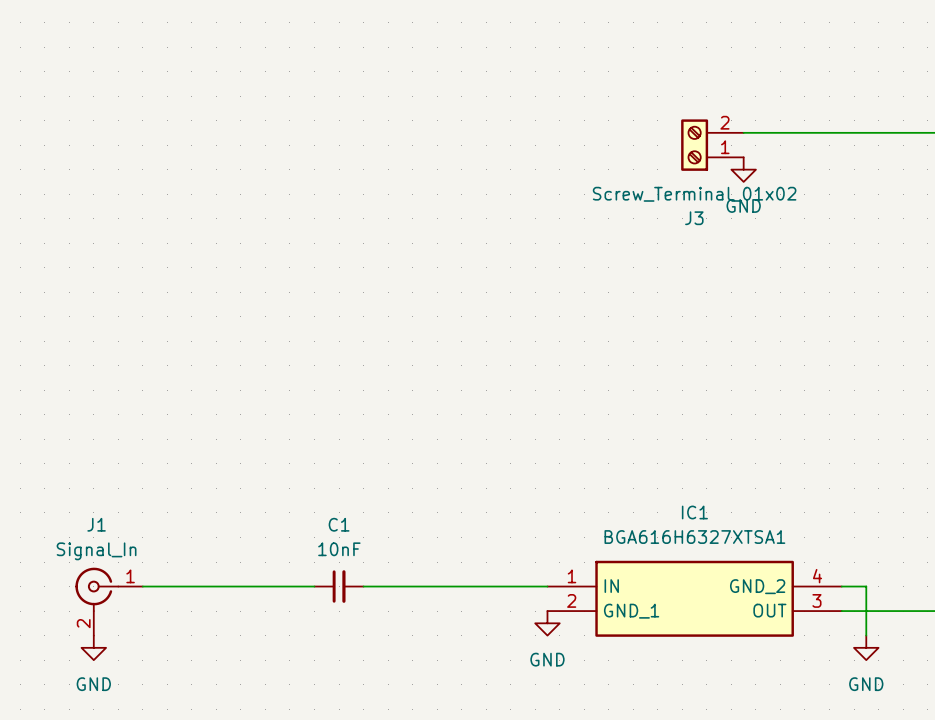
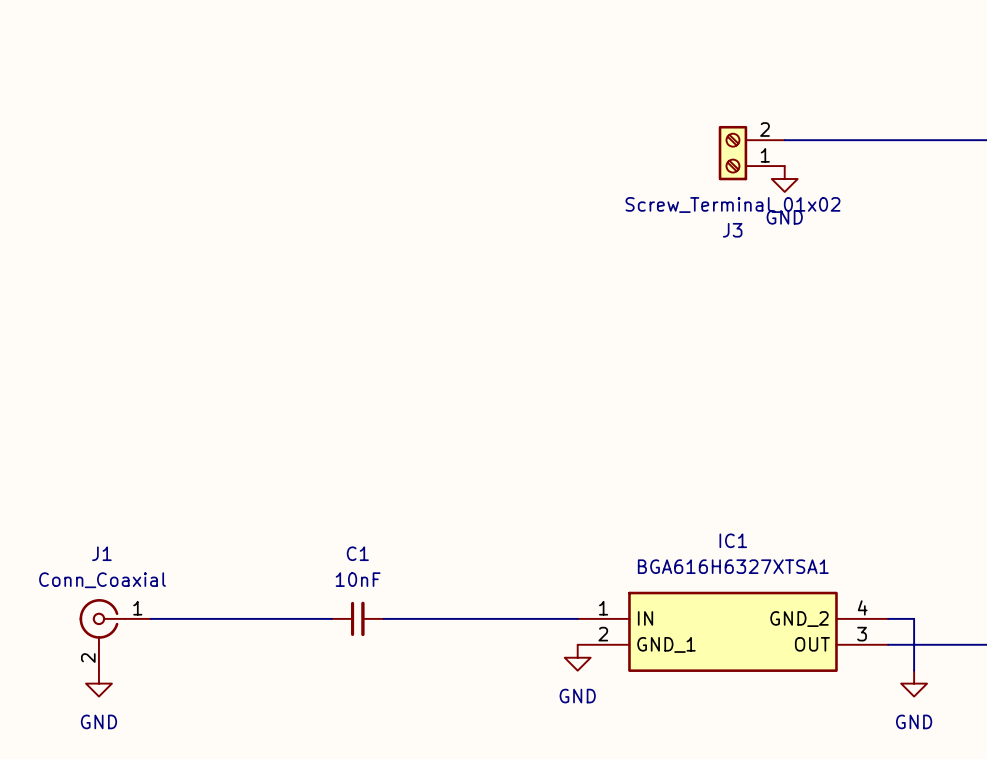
J1 value: Signal_In (96, 551) -> Conn_Coaxial (102, 580)

